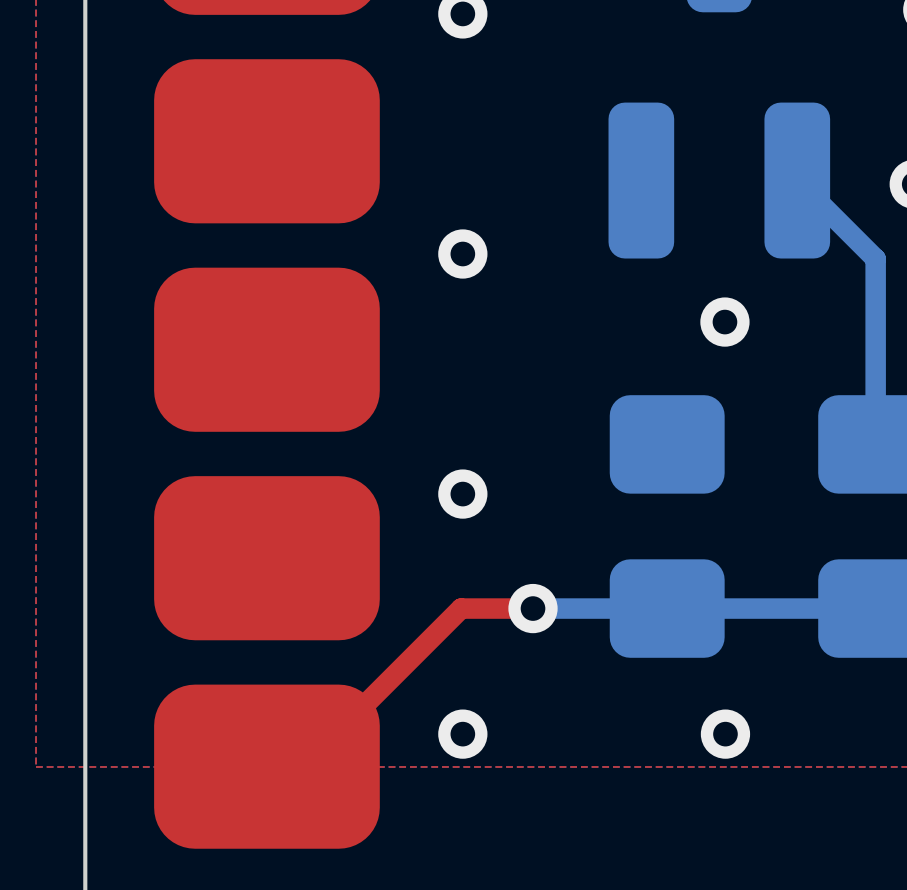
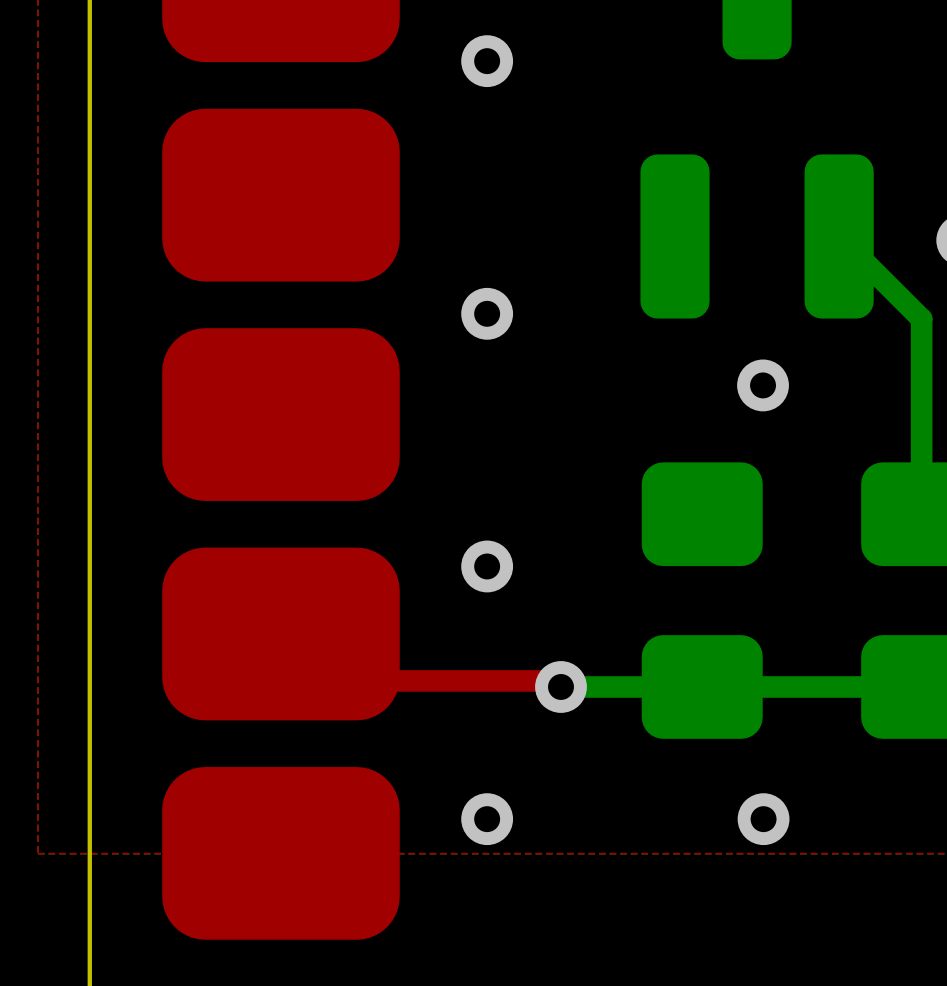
top track: (533, 608) (461, 608) (303, 766) (266, 766) -> (560, 686) (554, 680) (327, 680) (280, 633)

